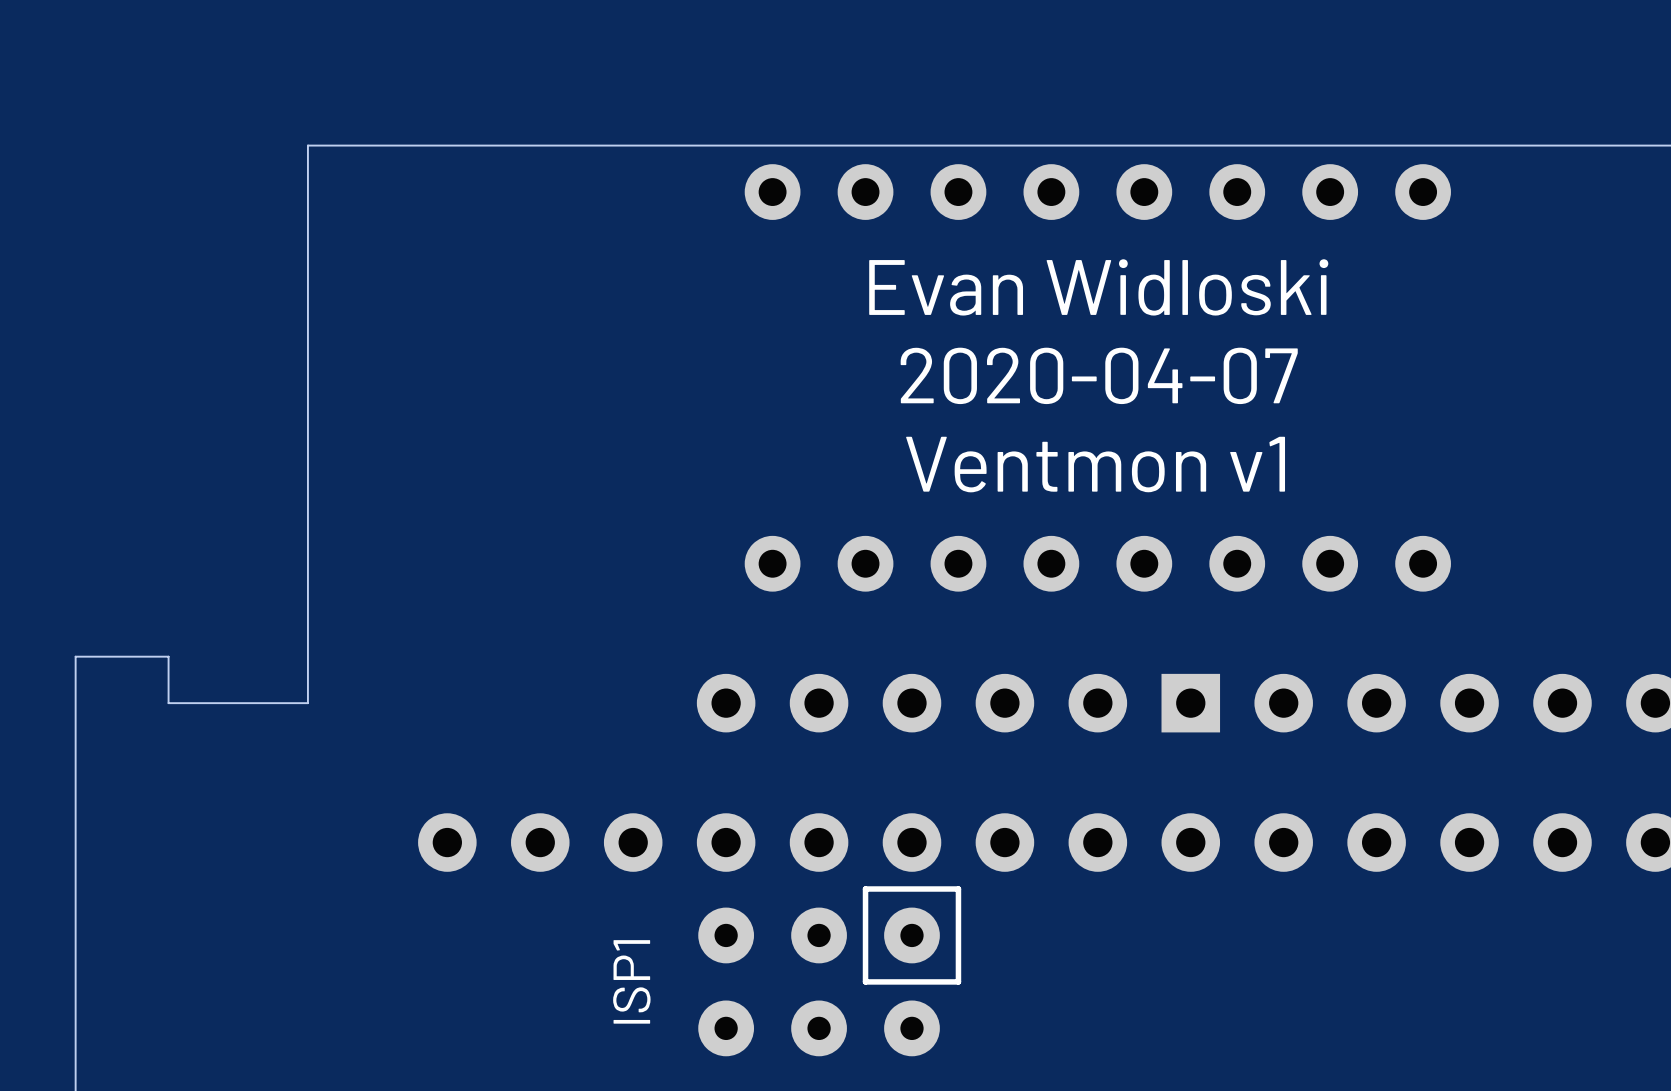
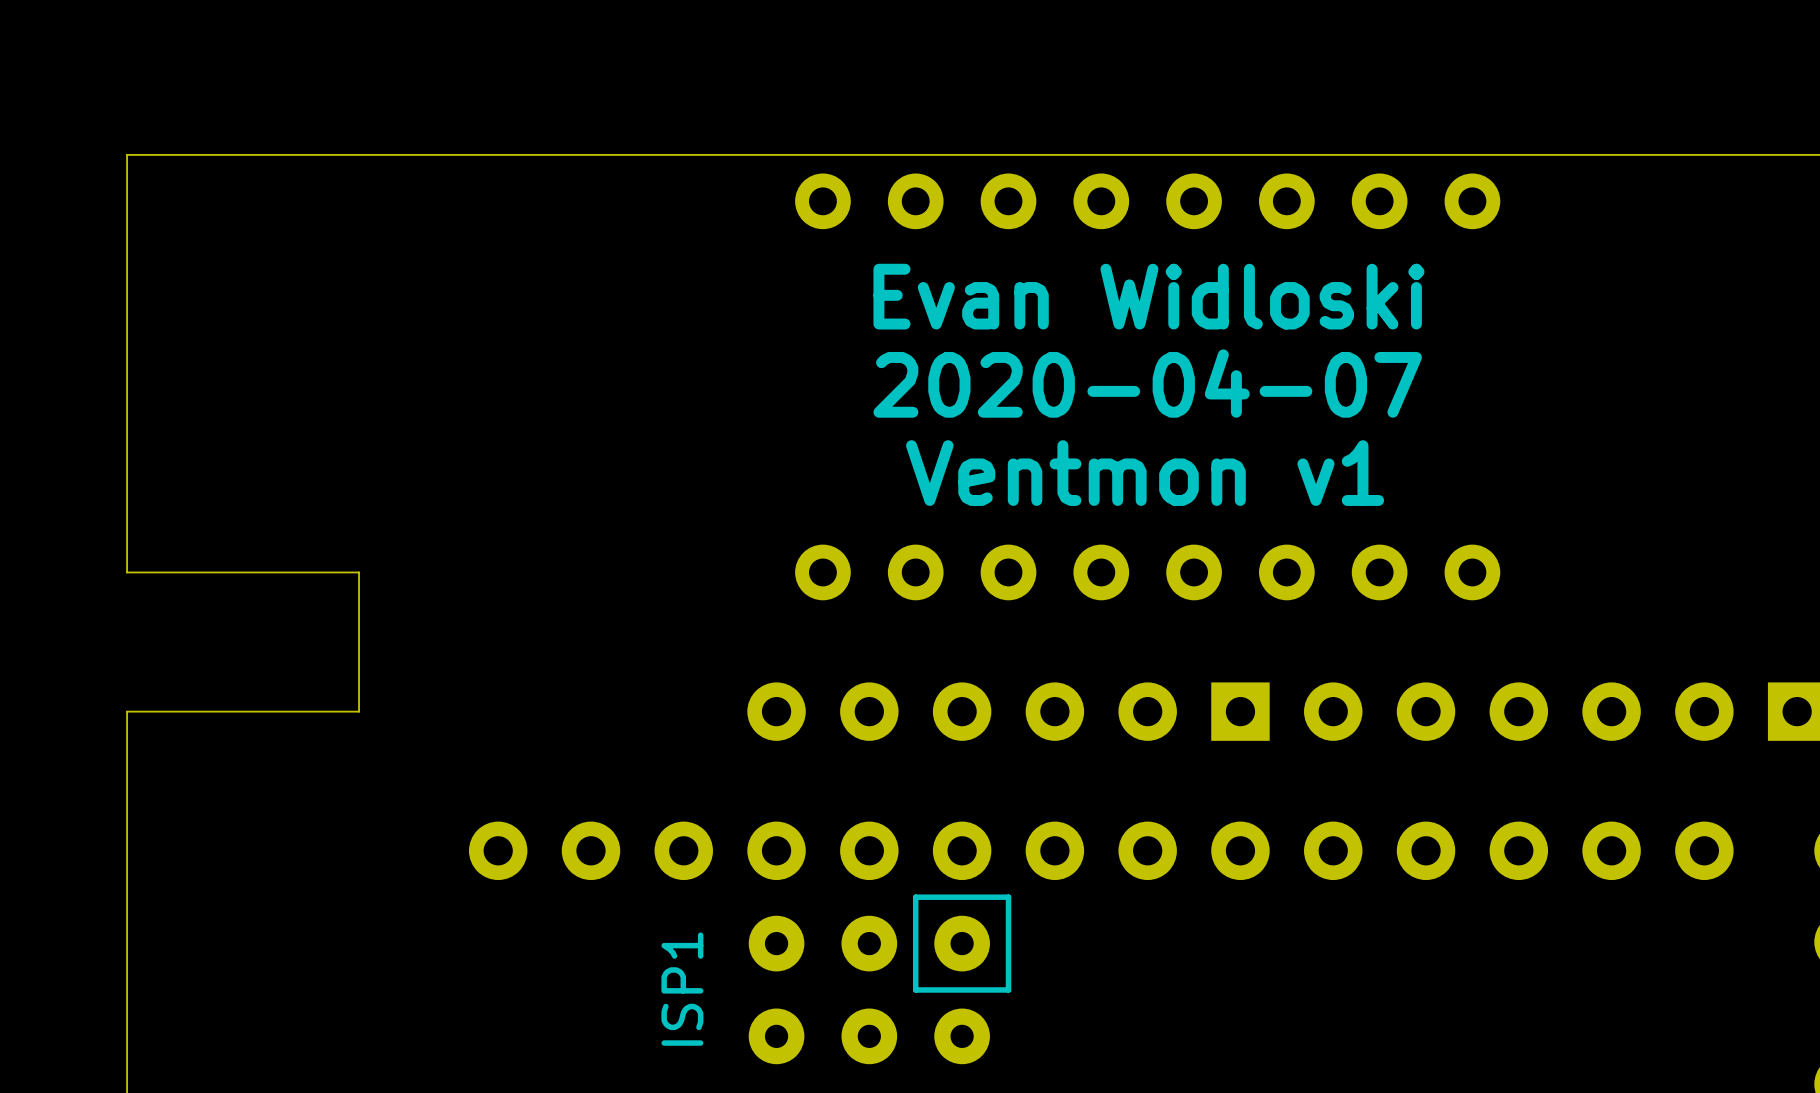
board edge: (307, 145) (307, 563) -> (359, 154) (127, 154) (127, 572) (359, 572)
board edge: (168, 703) (168, 656) (75, 656) (75, 703) -> (219, 711) (127, 711)

